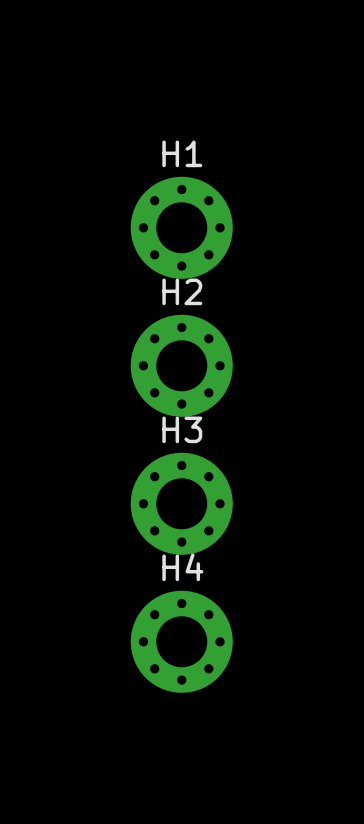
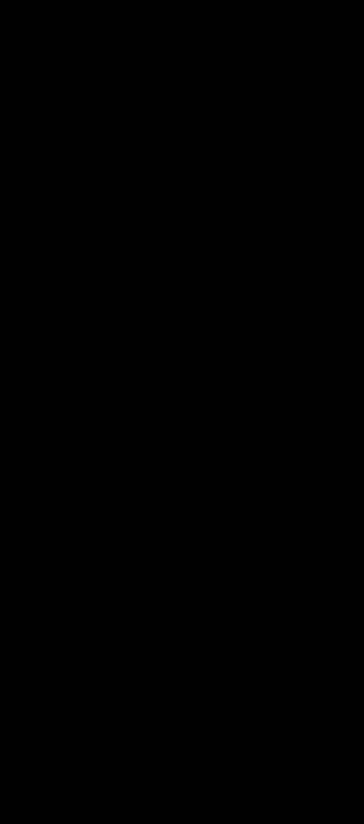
H1: (181, 227) -> none
H2: (181, 365) -> none
H3: (181, 503) -> none
H4: (181, 641) -> none

